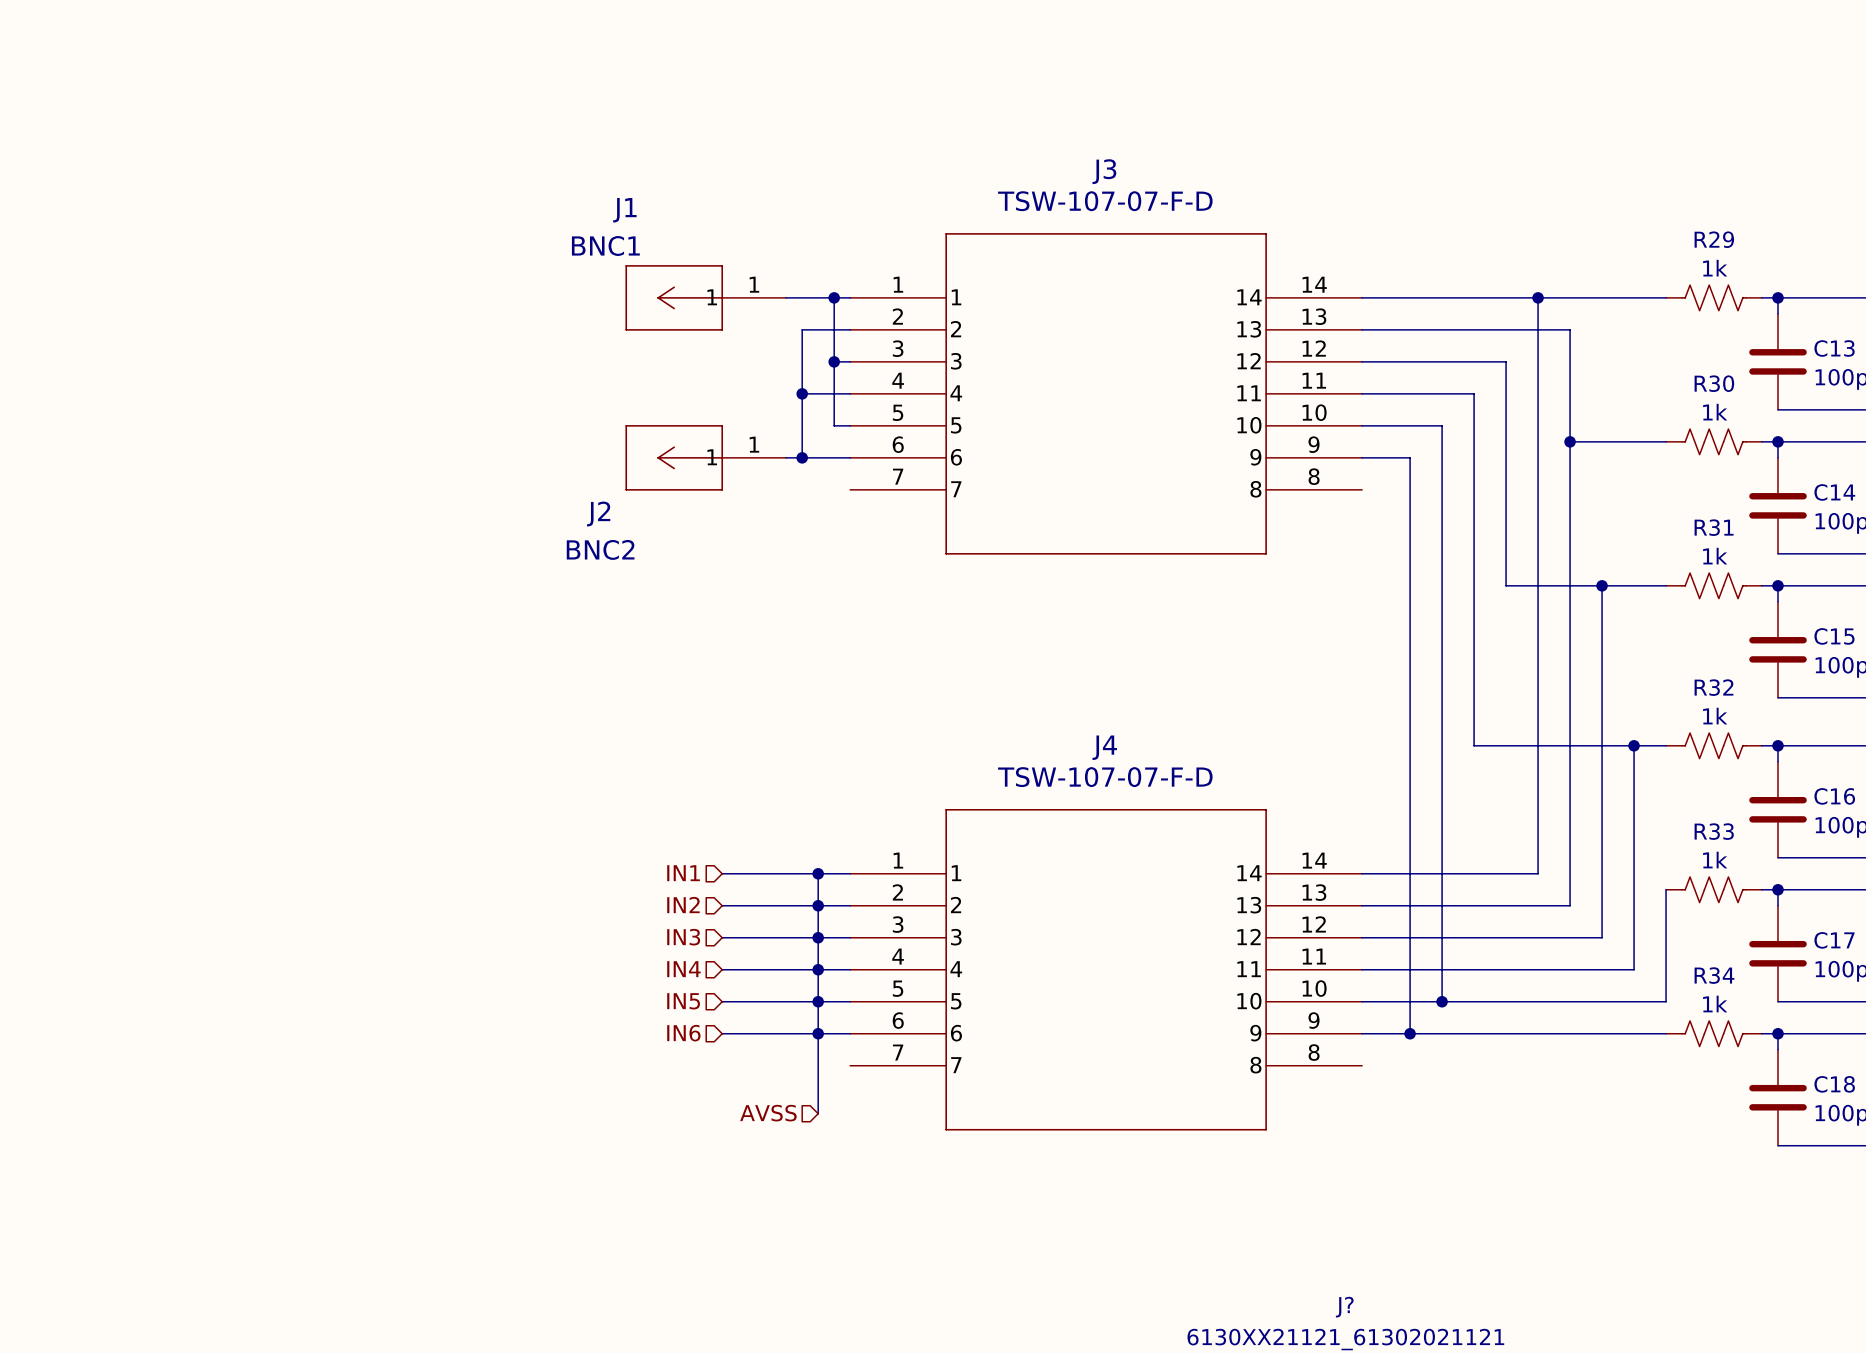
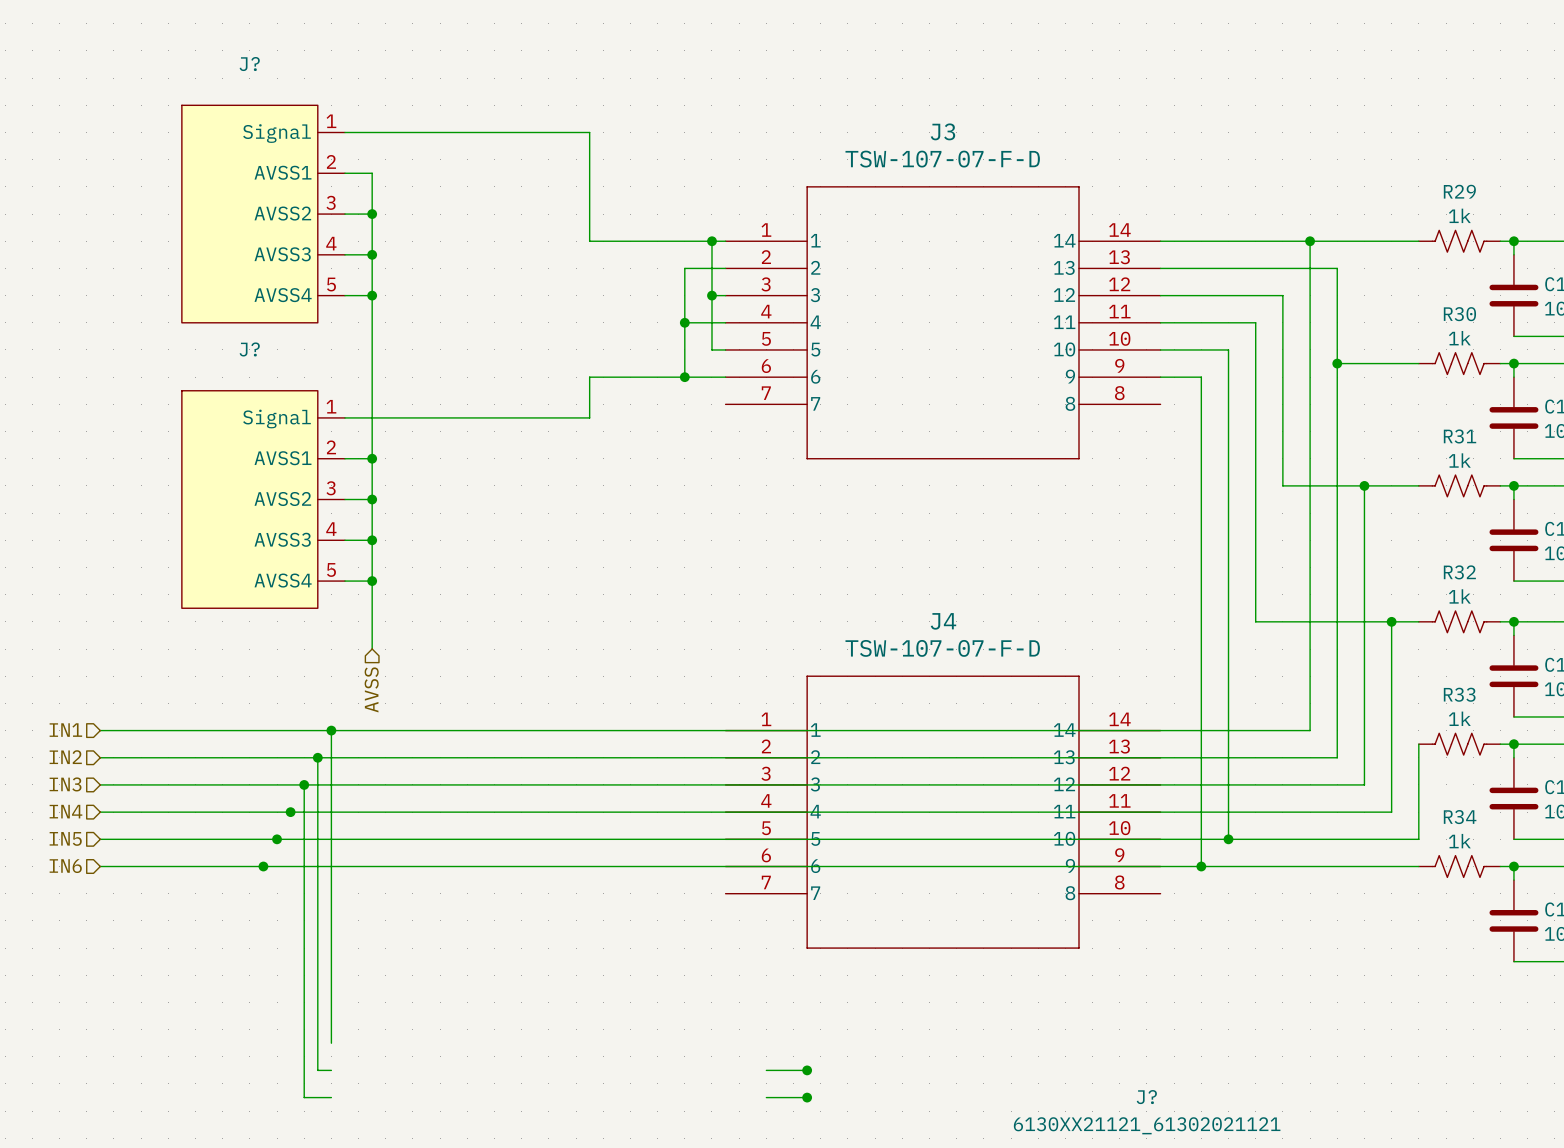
wire: none -> (344, 132) (589, 132) (589, 241) (671, 241)
wire: none -> (344, 173) (372, 173) (372, 649)
J?: none -> (263, 214)
wire: none -> (344, 214) (372, 214)
junction: none -> (372, 214)
J1: BNC1 (705, 297) -> none
wire: none -> (344, 254) (372, 254)
junction: none -> (372, 254)
wire: none -> (344, 295) (372, 295)
junction: none -> (372, 295)
J2: BNC2 (705, 457) -> none
wire: none -> (671, 377) (589, 377) (589, 417) (344, 417)
wire: none -> (344, 458) (372, 458)
junction: none -> (372, 458)
J?: none -> (263, 499)
wire: none -> (344, 499) (372, 499)
junction: none -> (372, 499)
wire: none -> (344, 540) (372, 540)
junction: none -> (372, 540)
wire: none -> (344, 581) (372, 581)
junction: none -> (372, 581)
hierarchical label: none -> AVSS (371, 689)
hierarchical label: none -> IN1 (65, 730)
wire: none -> (100, 730) (616, 730)
wire: none -> (331, 730) (331, 1043)
junction: none -> (331, 730)
hierarchical label: IN1 (683, 873) -> none
wire: (818, 873) (818, 1113) -> none
junction: (818, 873) -> none
wire: none -> (725, 730) (1160, 730)
hierarchical label: none -> IN2 (65, 757)
wire: none -> (100, 757) (616, 757)
wire: none -> (317, 757) (317, 1070) (331, 1070)
junction: none -> (317, 757)
hierarchical label: IN2 (683, 905) -> none
junction: (818, 905) -> none
wire: none -> (725, 757) (1160, 757)
hierarchical label: none -> IN3 (65, 784)
wire: none -> (100, 784) (616, 784)
wire: none -> (304, 784) (304, 1097) (331, 1097)
junction: none -> (304, 784)
hierarchical label: IN3 (683, 937) -> none
junction: (818, 937) -> none
wire: none -> (725, 784) (1160, 784)
hierarchical label: none -> IN4 (65, 811)
wire: none -> (100, 812) (616, 812)
junction: none -> (290, 812)
hierarchical label: IN4 (683, 969) -> none
junction: (818, 969) -> none
wire: none -> (725, 812) (1160, 812)
hierarchical label: none -> IN5 (65, 838)
wire: none -> (100, 839) (616, 839)
junction: none -> (277, 839)
hierarchical label: IN5 (683, 1001) -> none
junction: (818, 1001) -> none
wire: none -> (725, 839) (1160, 839)
hierarchical label: none -> IN6 (65, 866)
wire: none -> (100, 866) (616, 866)
junction: none -> (263, 866)
hierarchical label: IN6 (683, 1033) -> none
junction: (818, 1033) -> none
wire: none -> (725, 866) (1160, 866)
hierarchical label: AVSS (768, 1113) -> none
wire: none -> (766, 1070) (807, 1070)
junction: none -> (807, 1070)
wire: none -> (766, 1097) (807, 1097)
junction: none -> (807, 1097)

